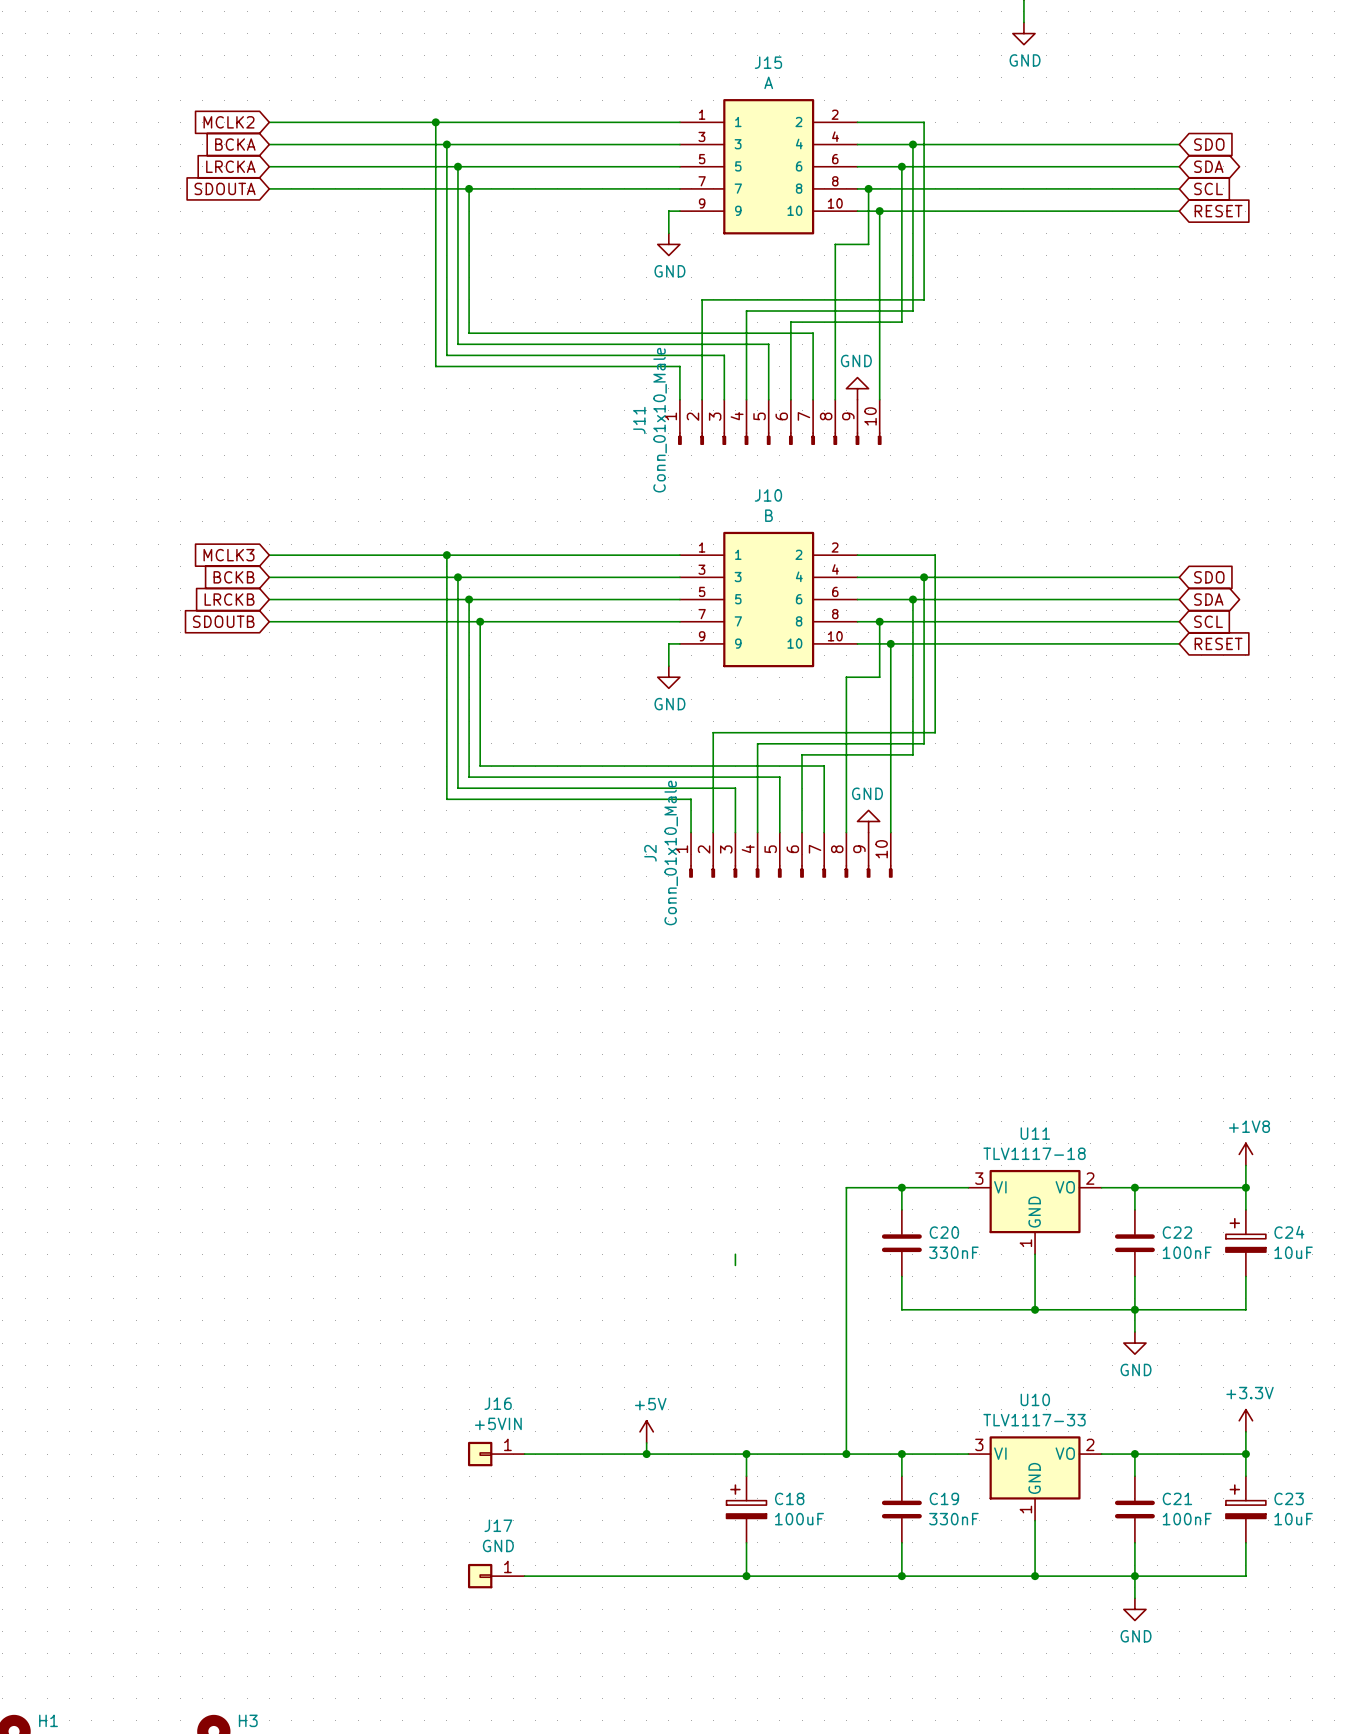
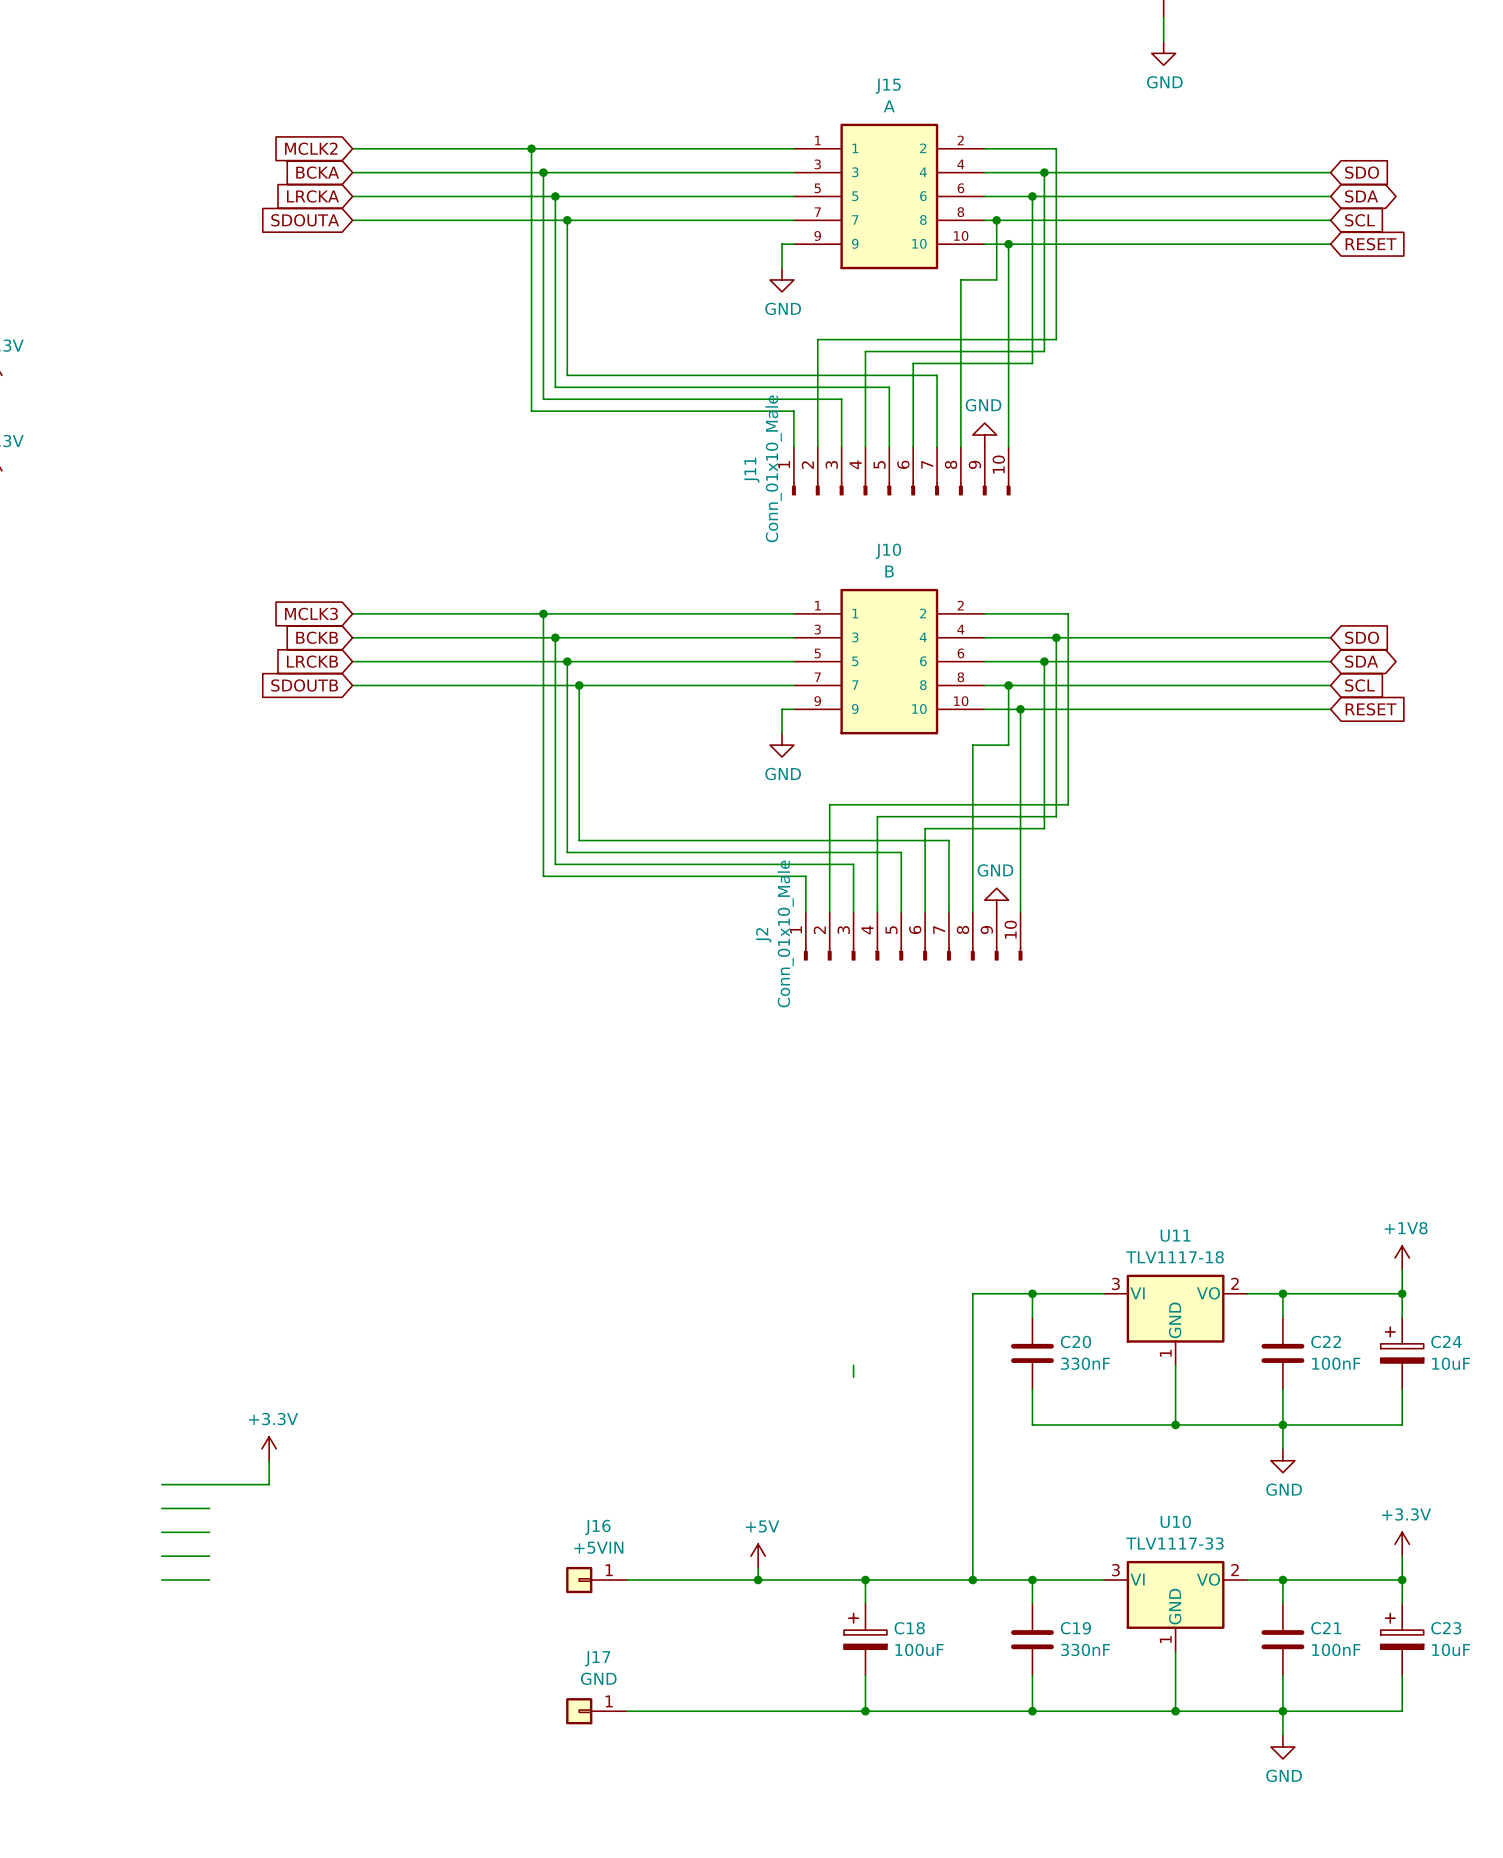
power symbol: none -> +3.3V (269, 1448)
wire: none -> (269, 1460) (269, 1484) (161, 1484)
wire: none -> (161, 1508) (209, 1508)
wire: none -> (161, 1532) (209, 1532)
wire: none -> (161, 1556) (209, 1556)
wire: none -> (161, 1580) (209, 1580)

